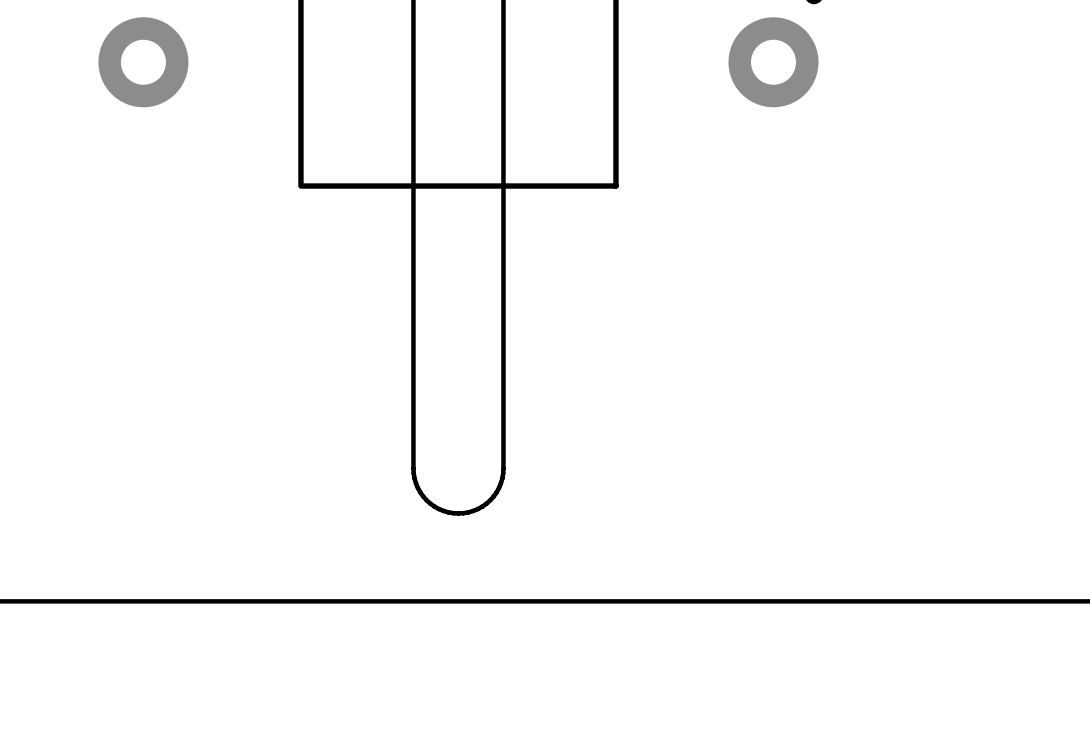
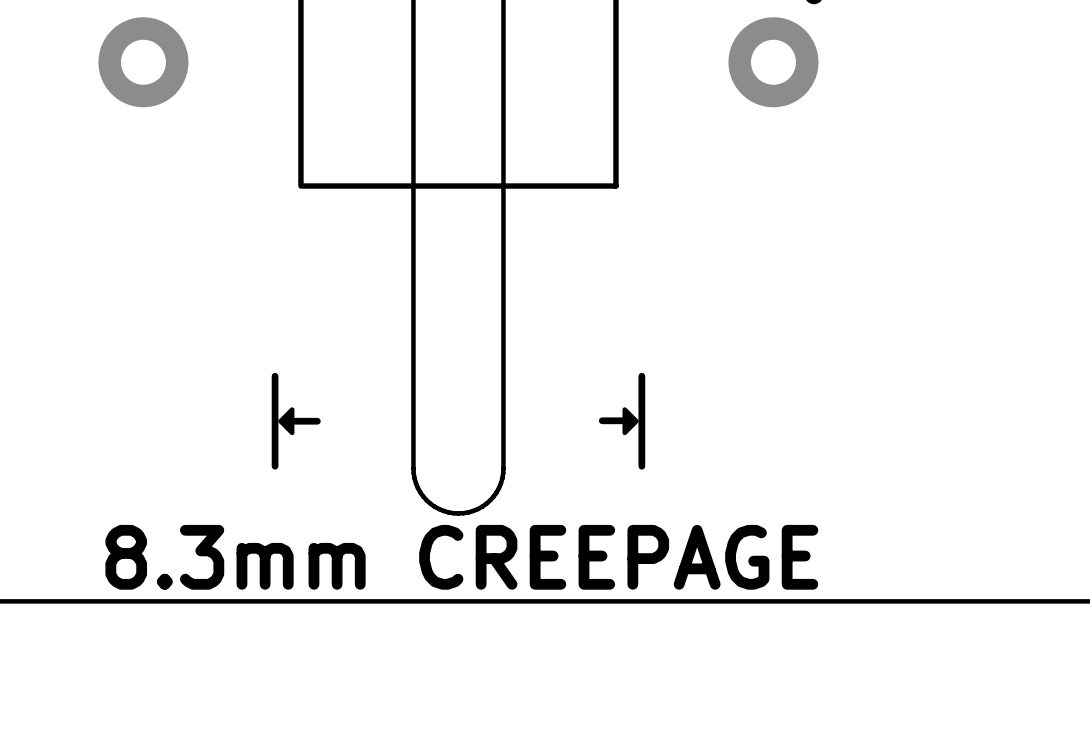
line: none -> (275, 376) (275, 466)
line: none -> (641, 376) (641, 466)
drawing: none -> [278, 407, 295, 436]
drawing: none -> [622, 407, 639, 436]
line: none -> (602, 420) (624, 420)
line: none -> (294, 421) (317, 421)
text: none -> 8.3mm CREEPAGE (461, 557)

